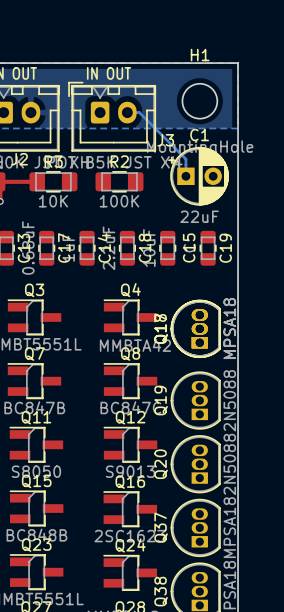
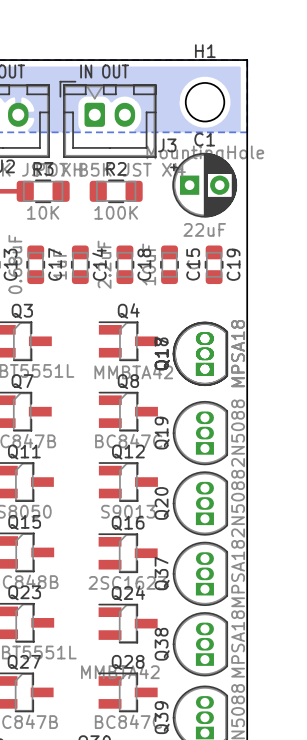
bottom track: (127, 112) (139, 112) (185, 159) (185, 176) -> none

